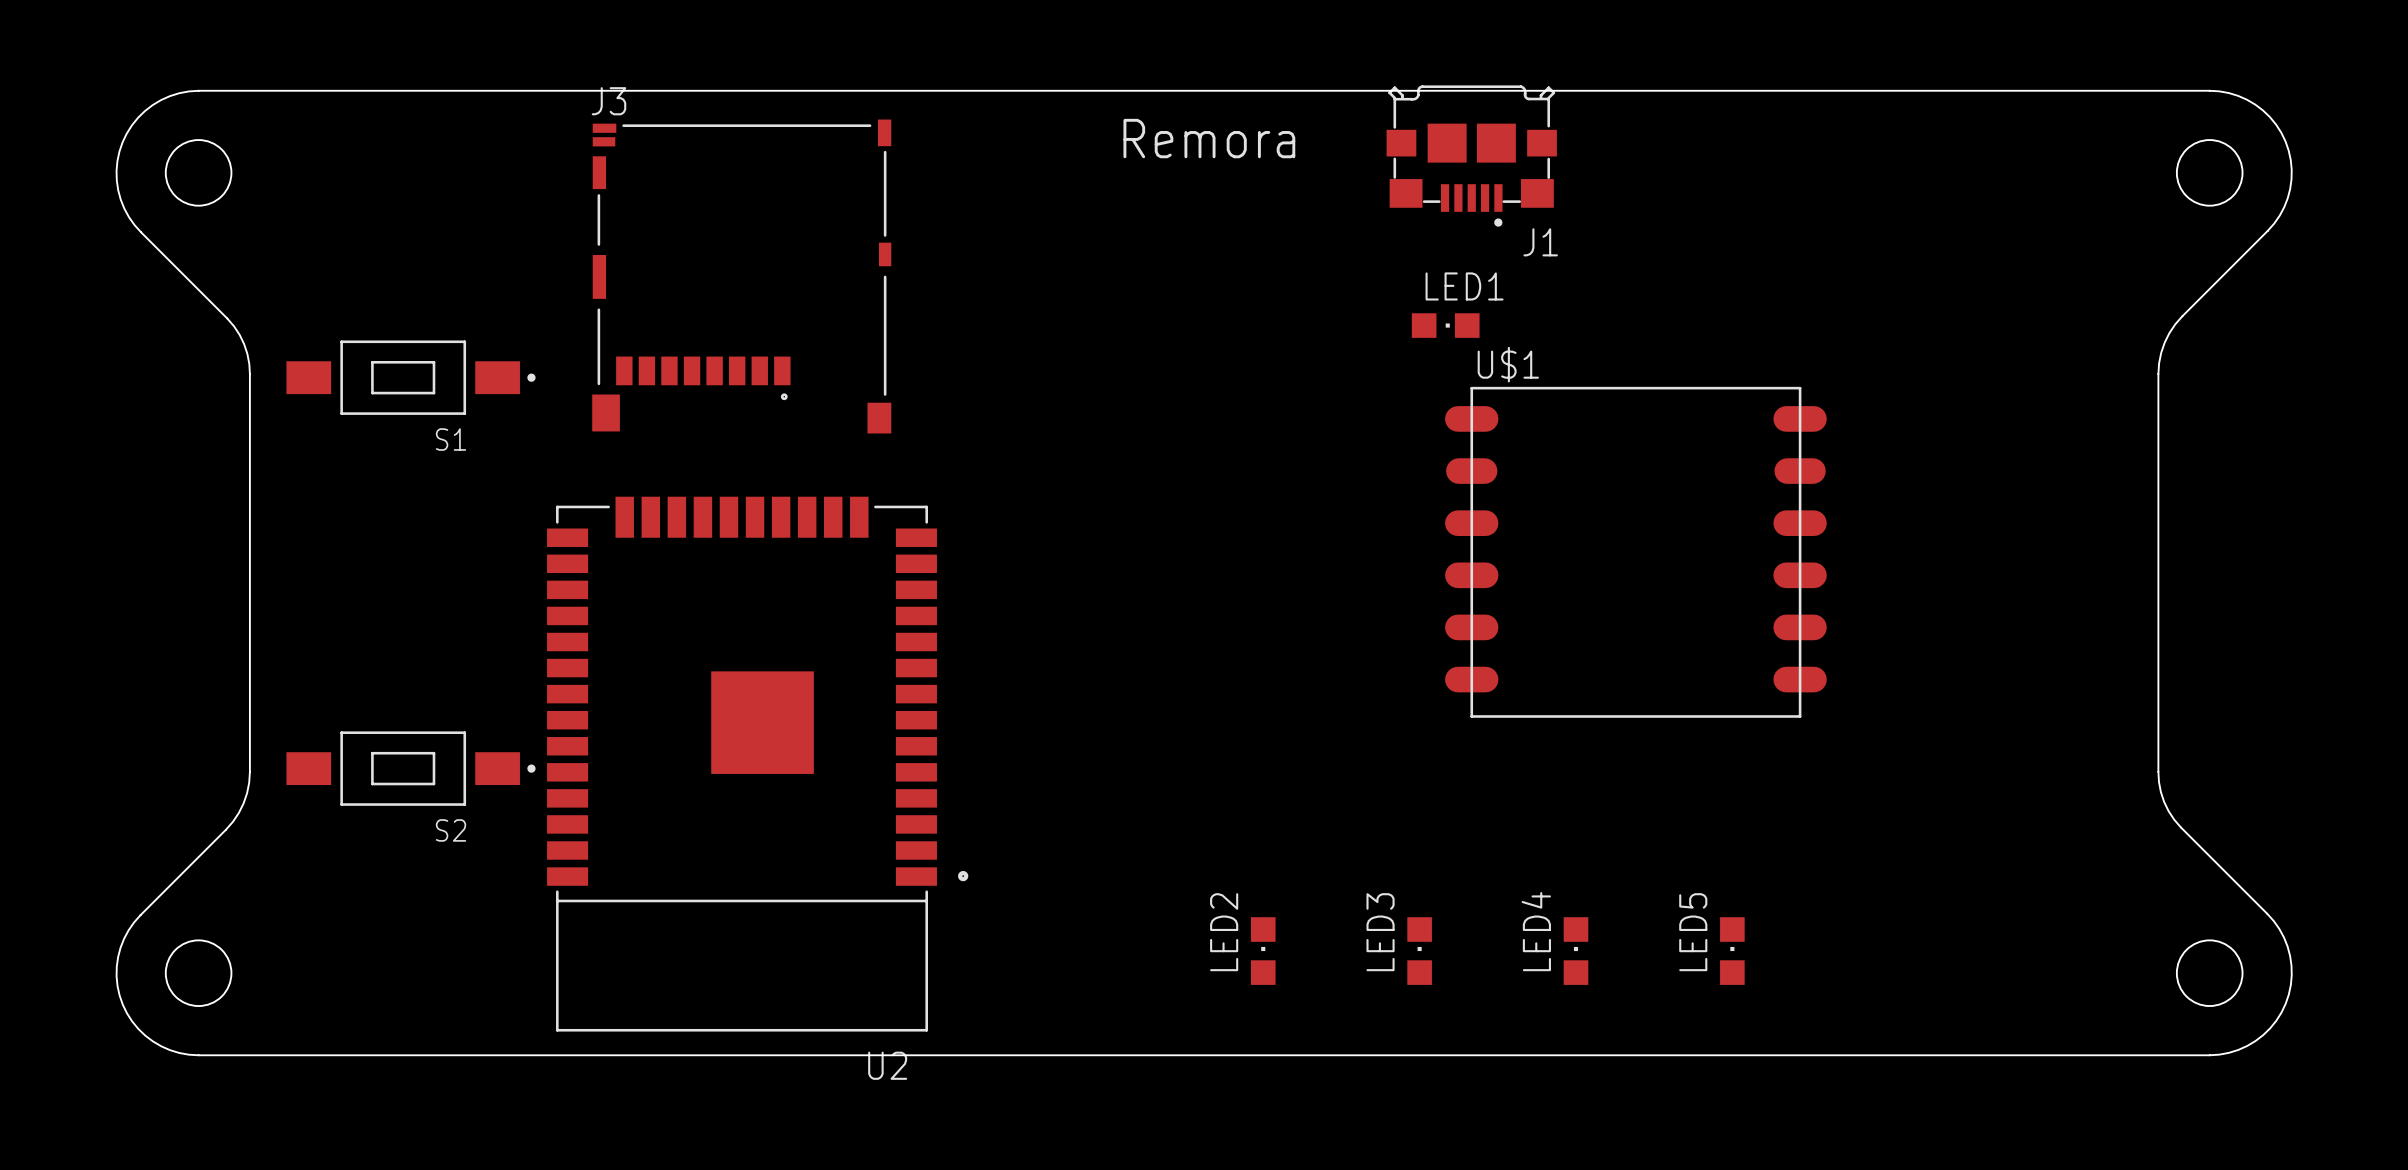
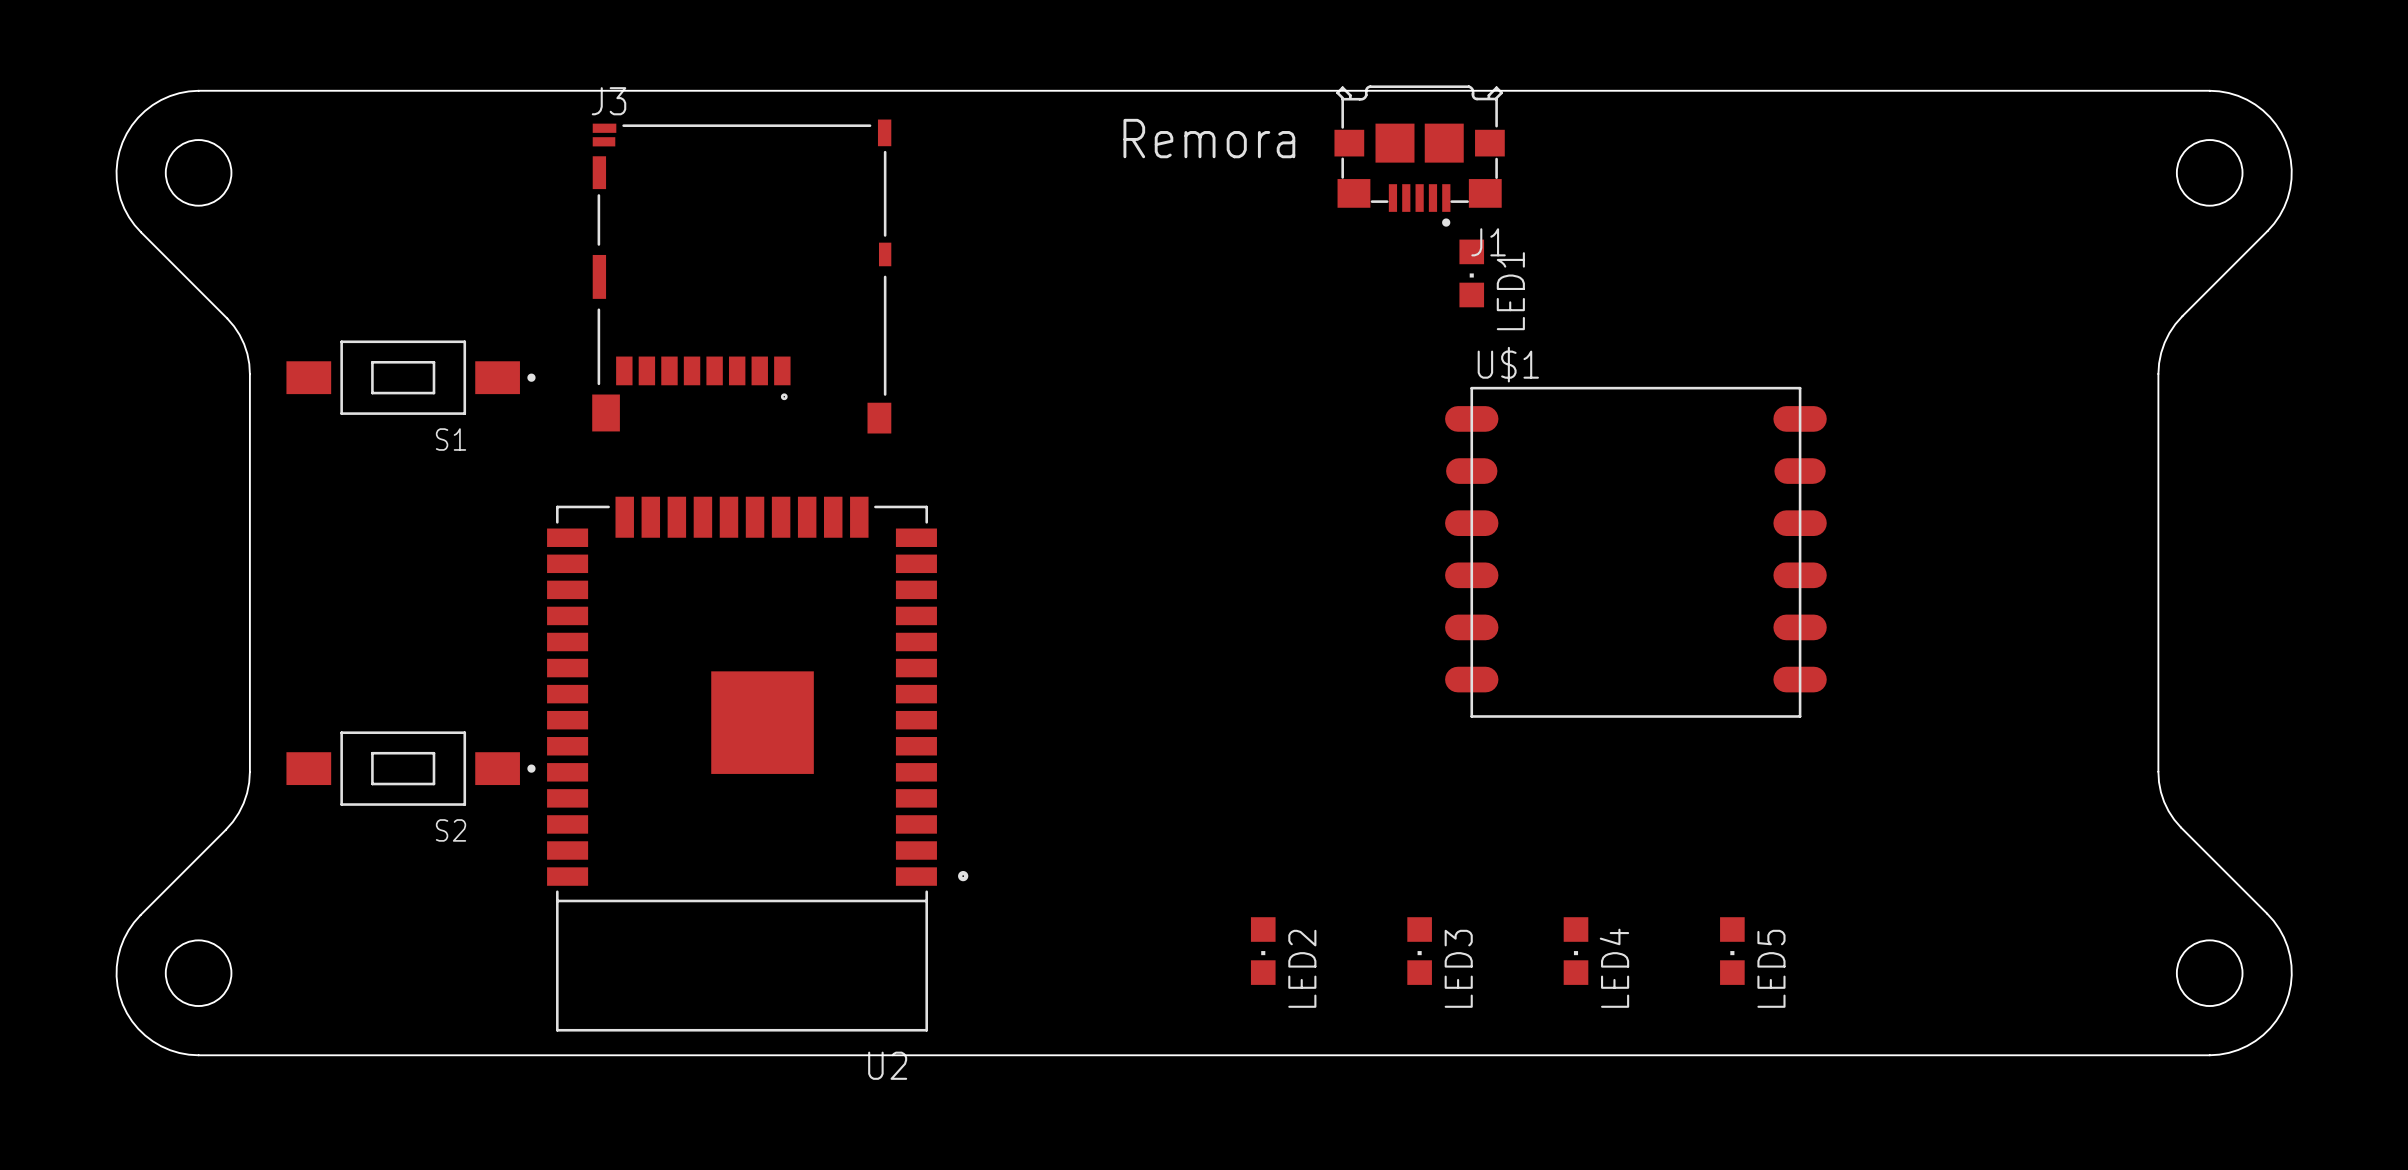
J1 position: (1471, 156) -> (1419, 156)
LED1 rotation: 0° (1445, 325) -> 90° clockwise (1471, 273)
LED1 position: (1445, 325) -> (1471, 273)
LED2 rotation: 0° (1263, 951) -> 180° (1263, 951)
LED3 rotation: 0° (1419, 951) -> 180° (1419, 951)
LED4 rotation: 0° (1575, 951) -> 180° (1575, 951)
LED5 rotation: 0° (1732, 951) -> 180° (1732, 951)

